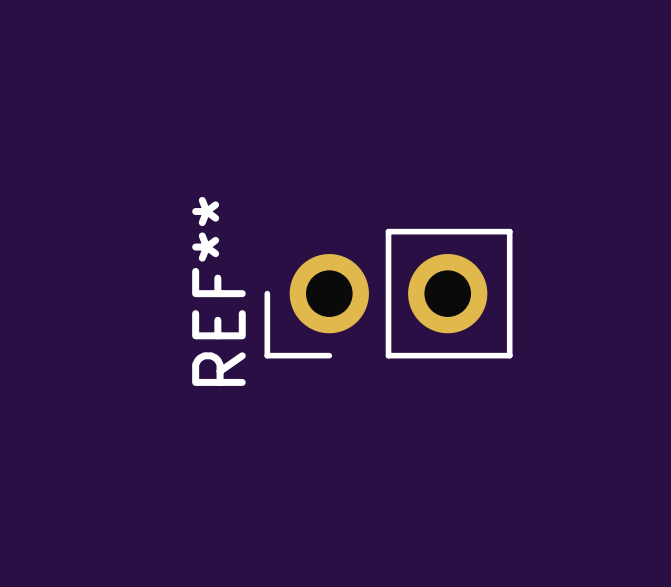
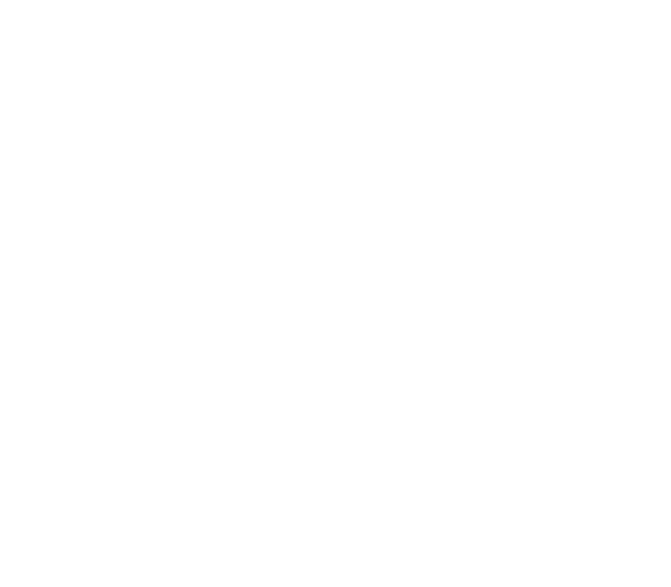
REF**: (388, 293) -> none

